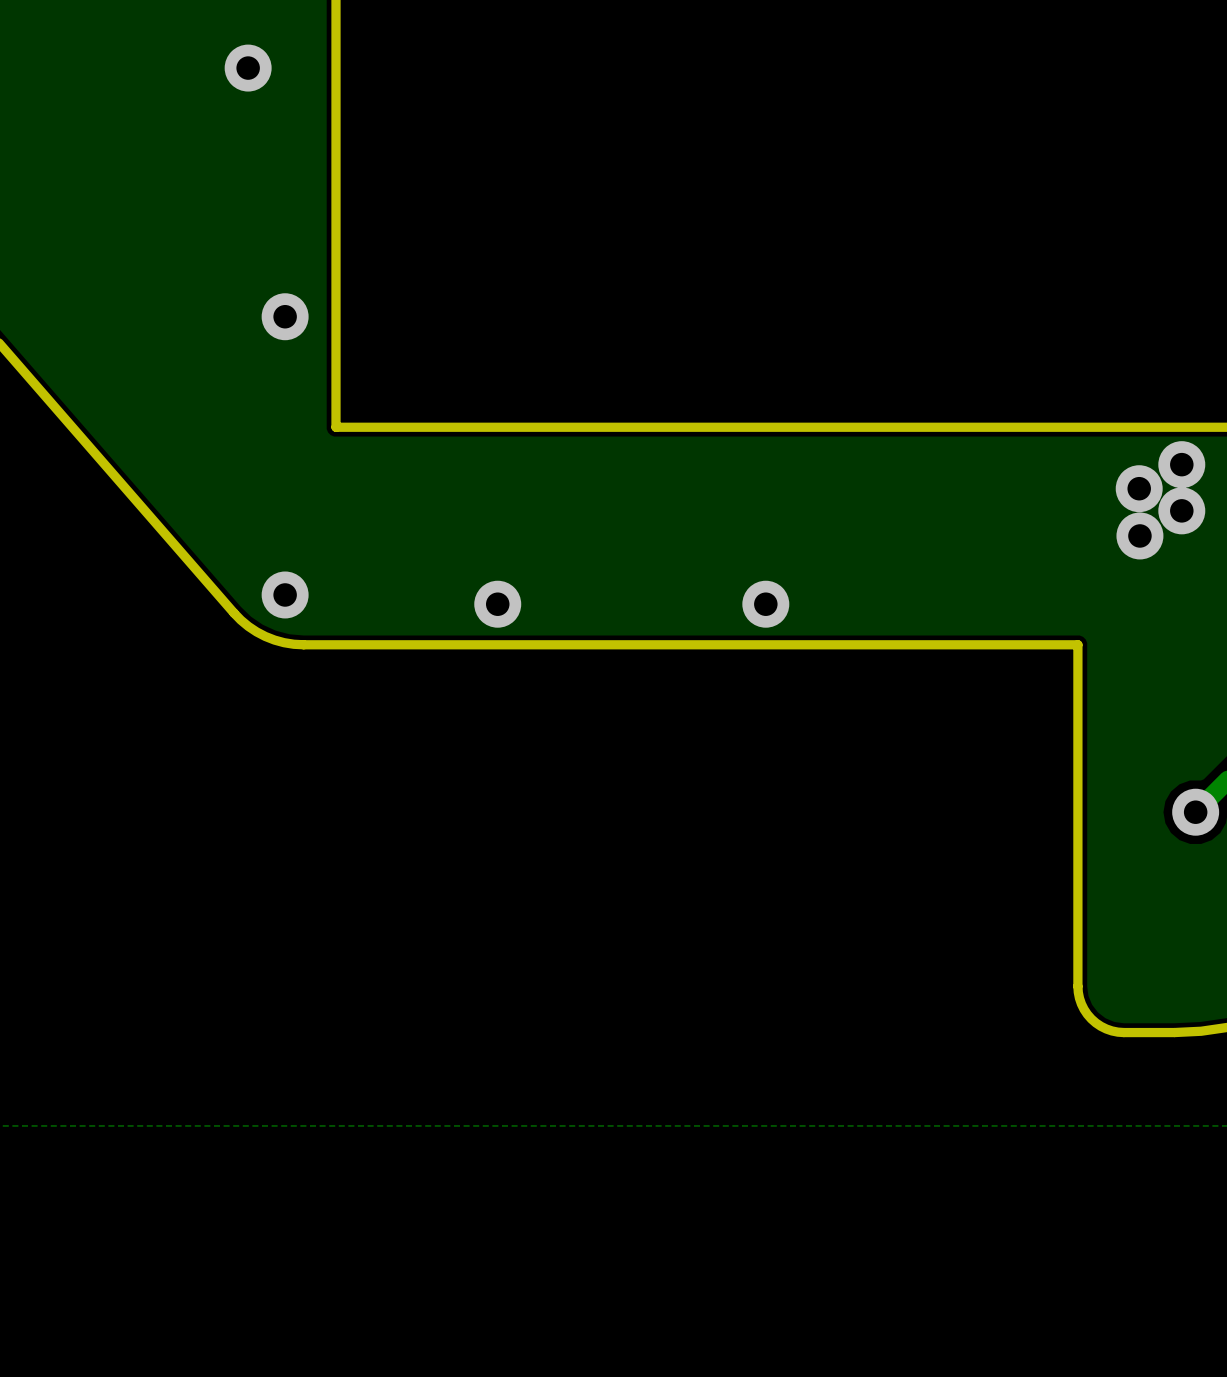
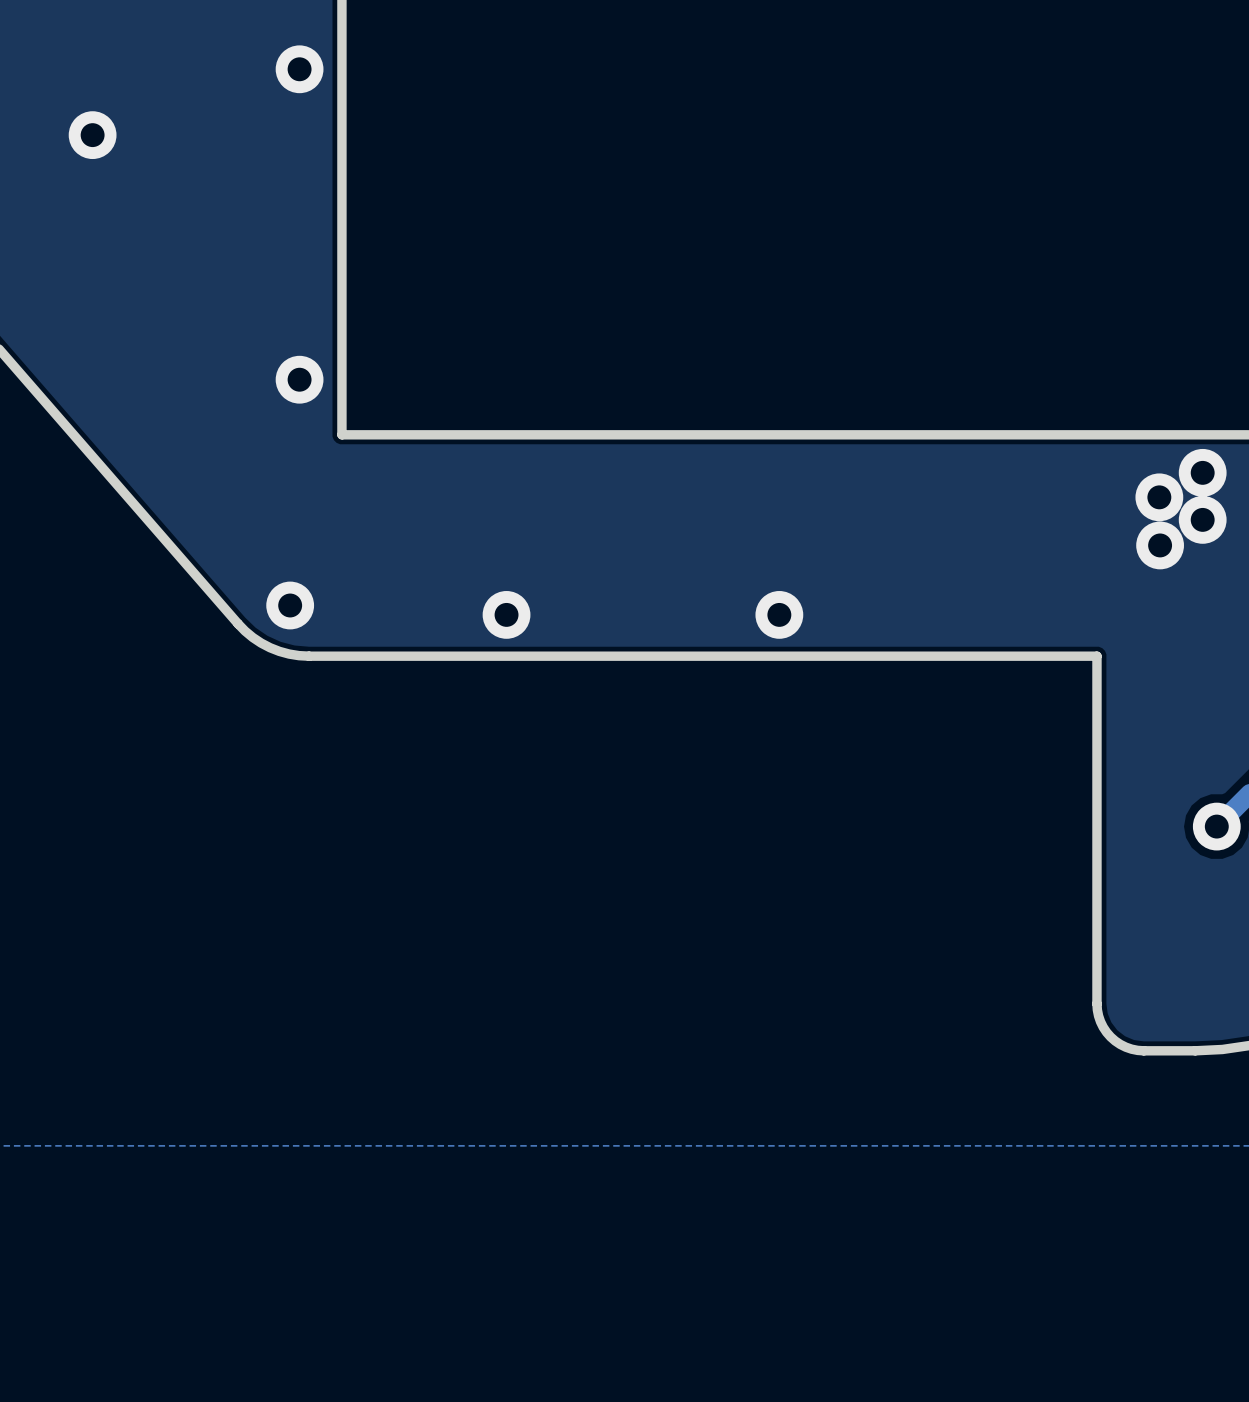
via position: (248, 68) -> (299, 69)
via: none -> (92, 135)
via position: (285, 316) -> (299, 379)

